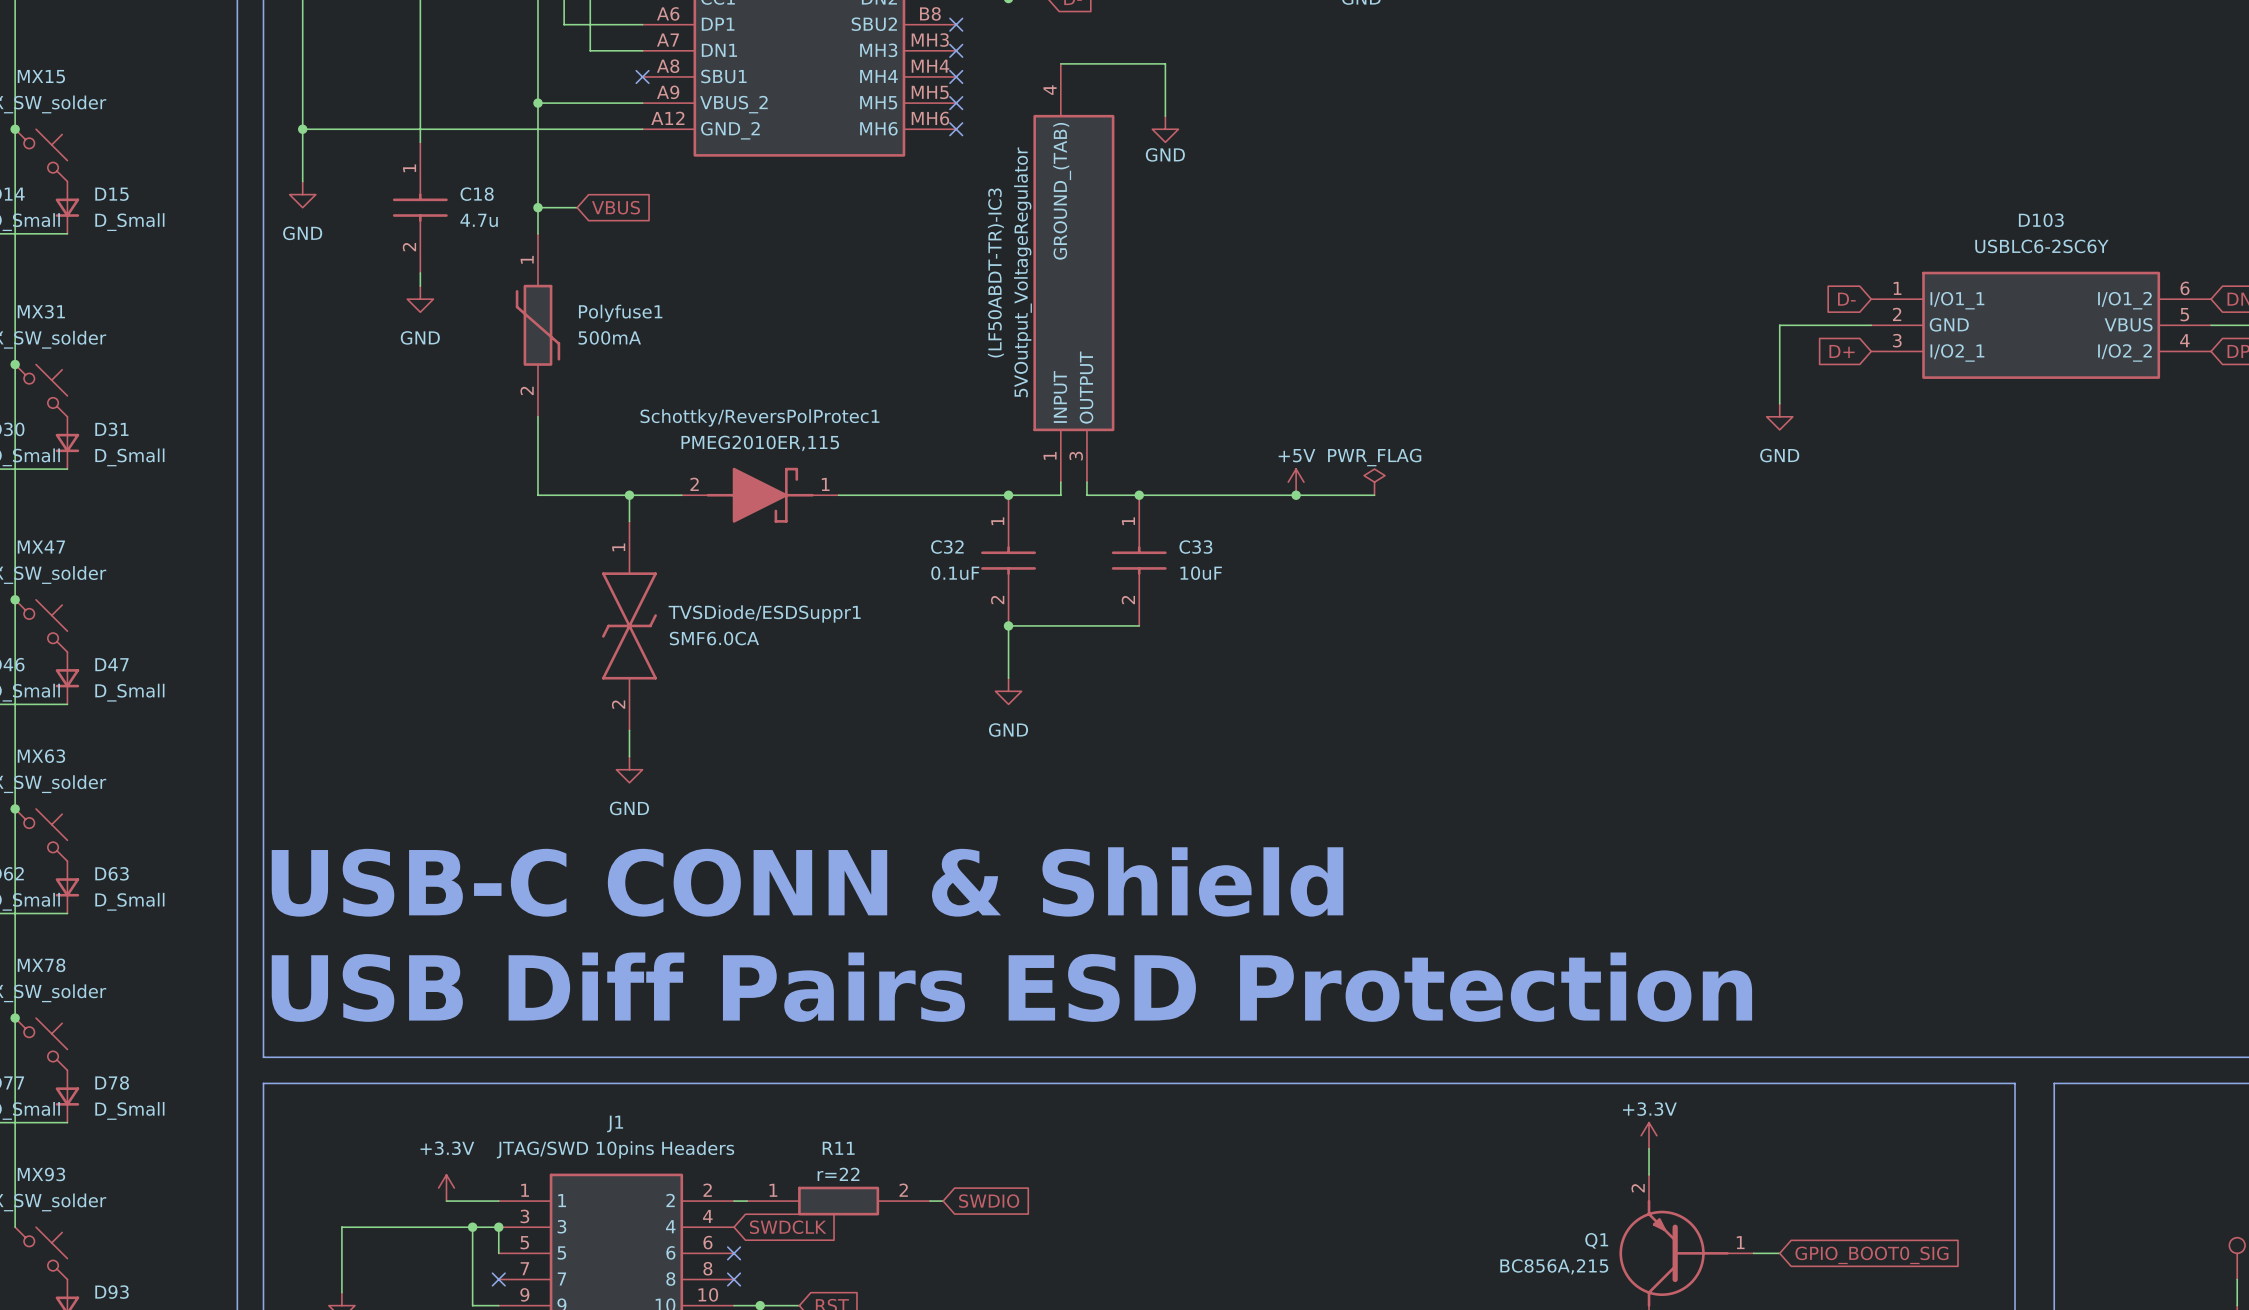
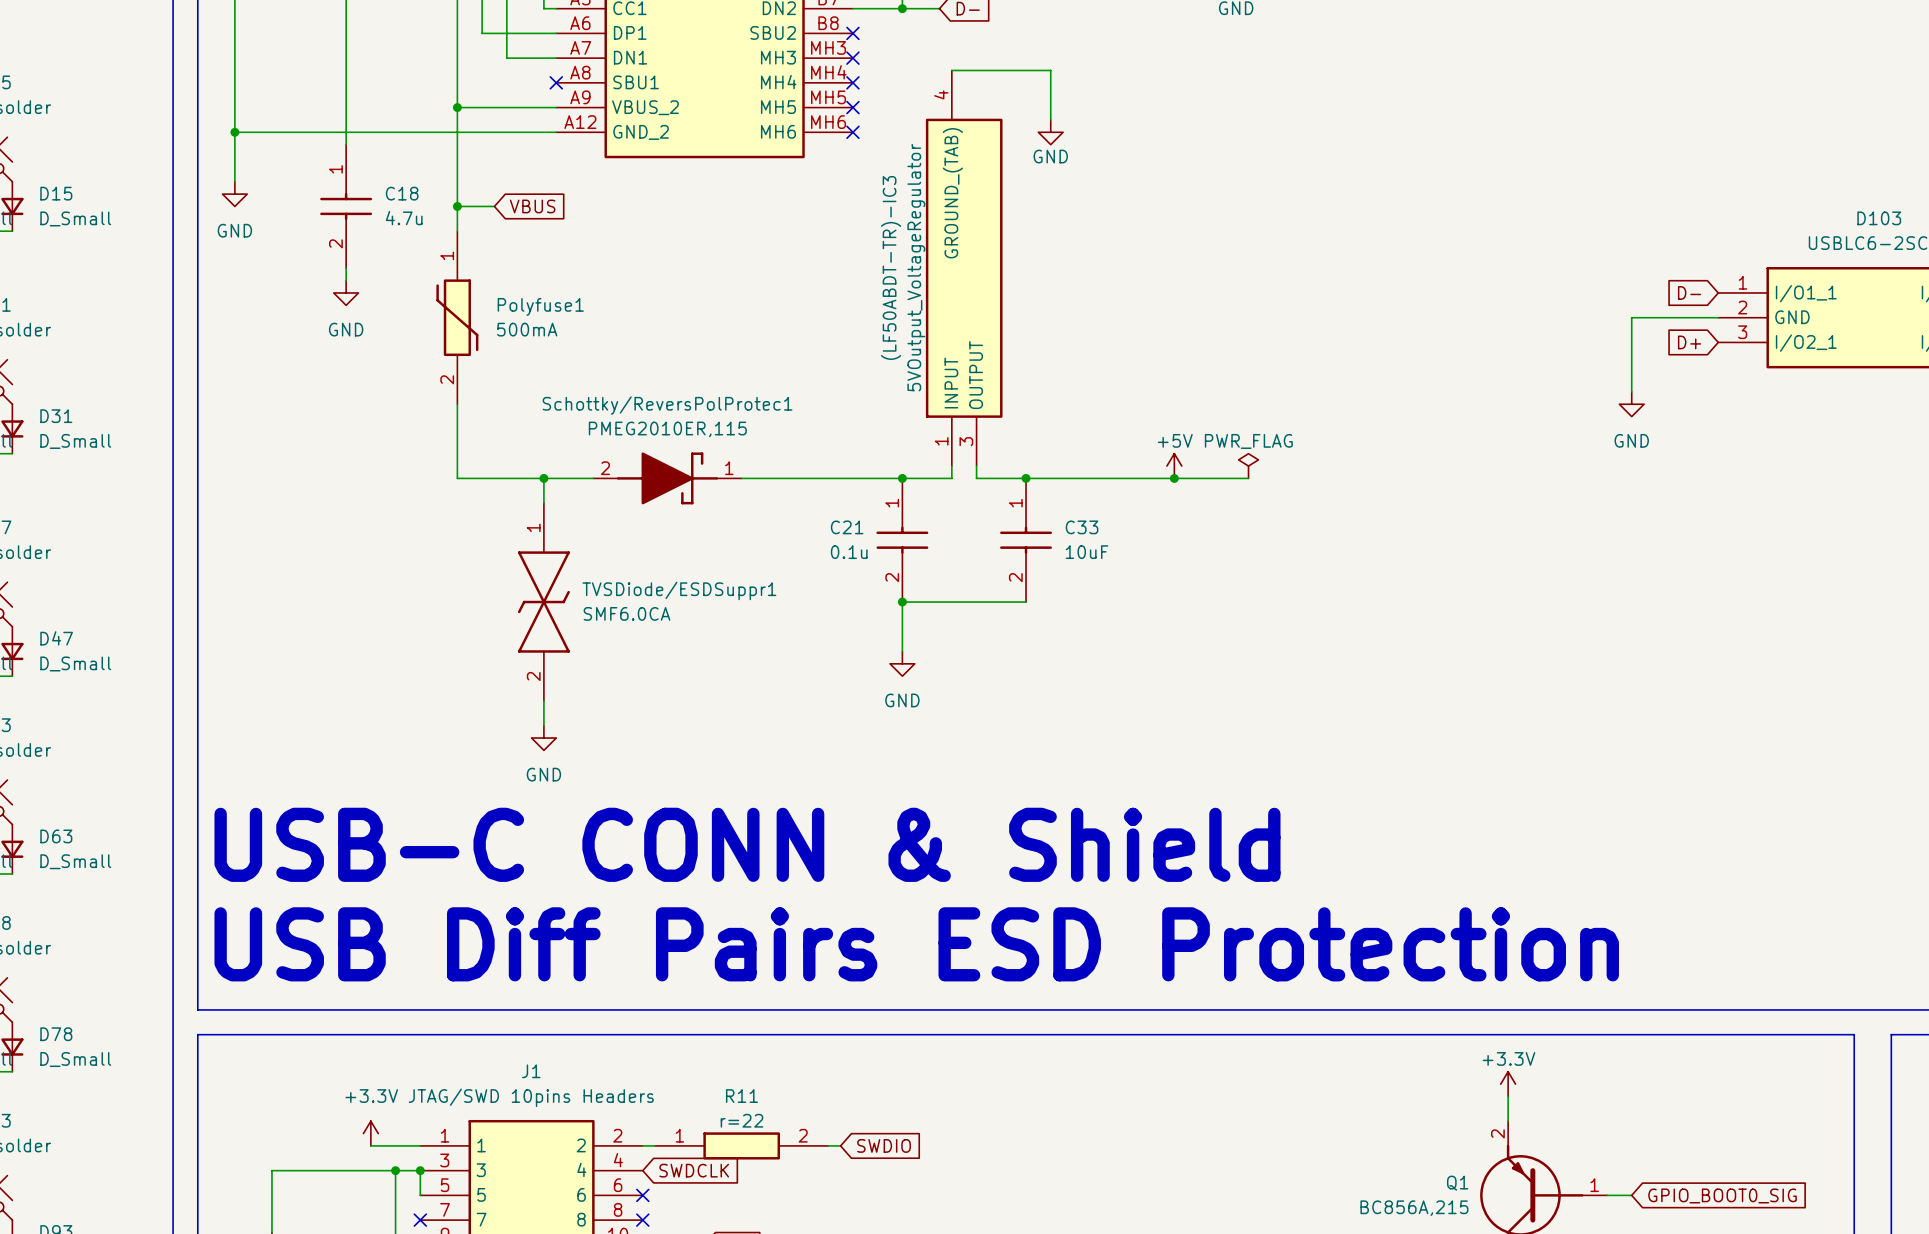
C32 name: C32 (947, 547) -> C21 (847, 527)
C32 value: 0.1uF (955, 573) -> 0.1u (849, 552)

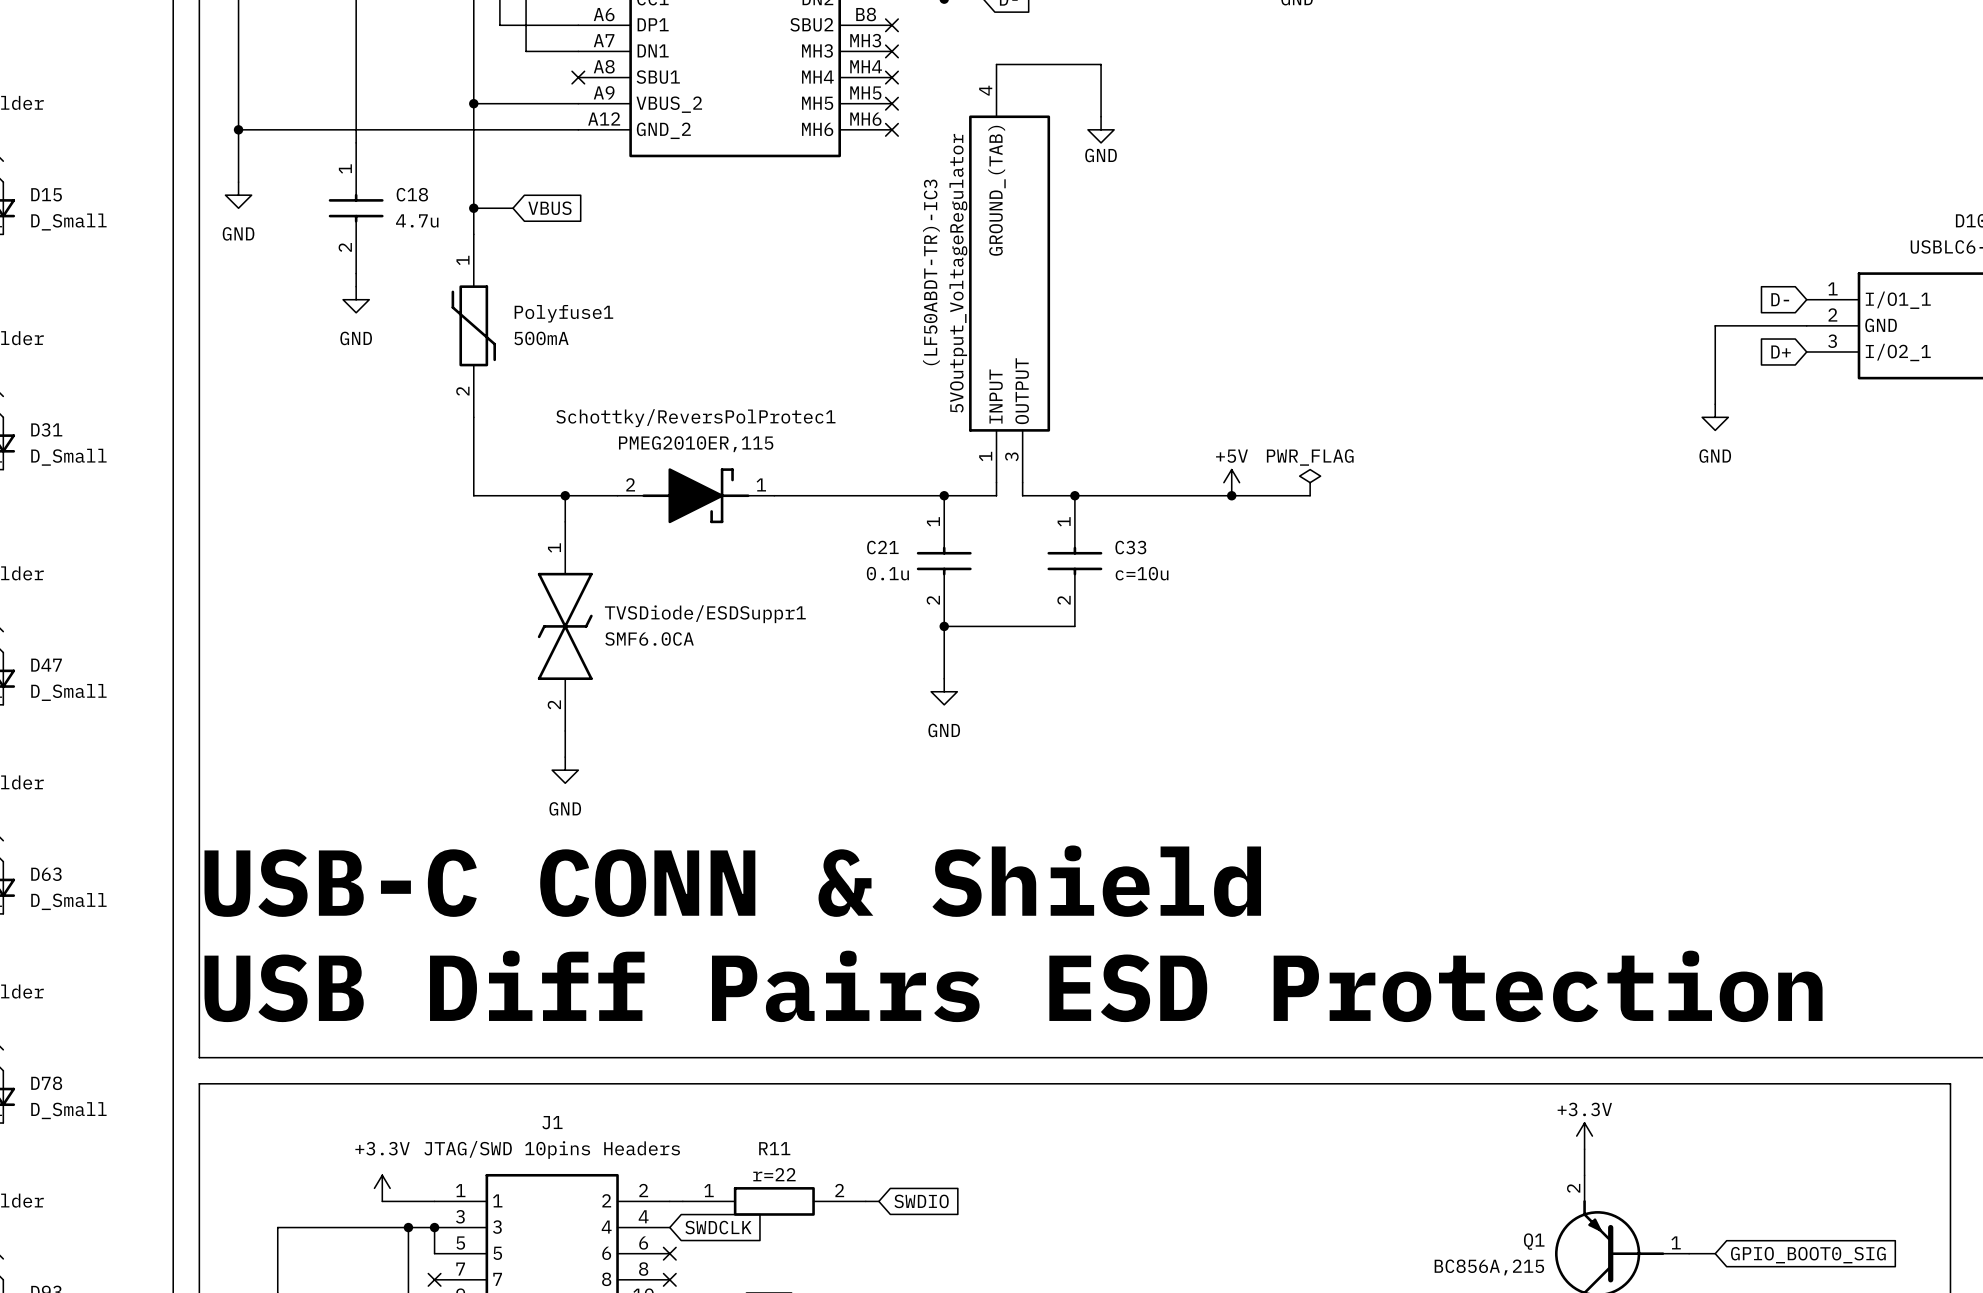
C33 value: 10uF (1087, 552) -> c=10u (1142, 573)

